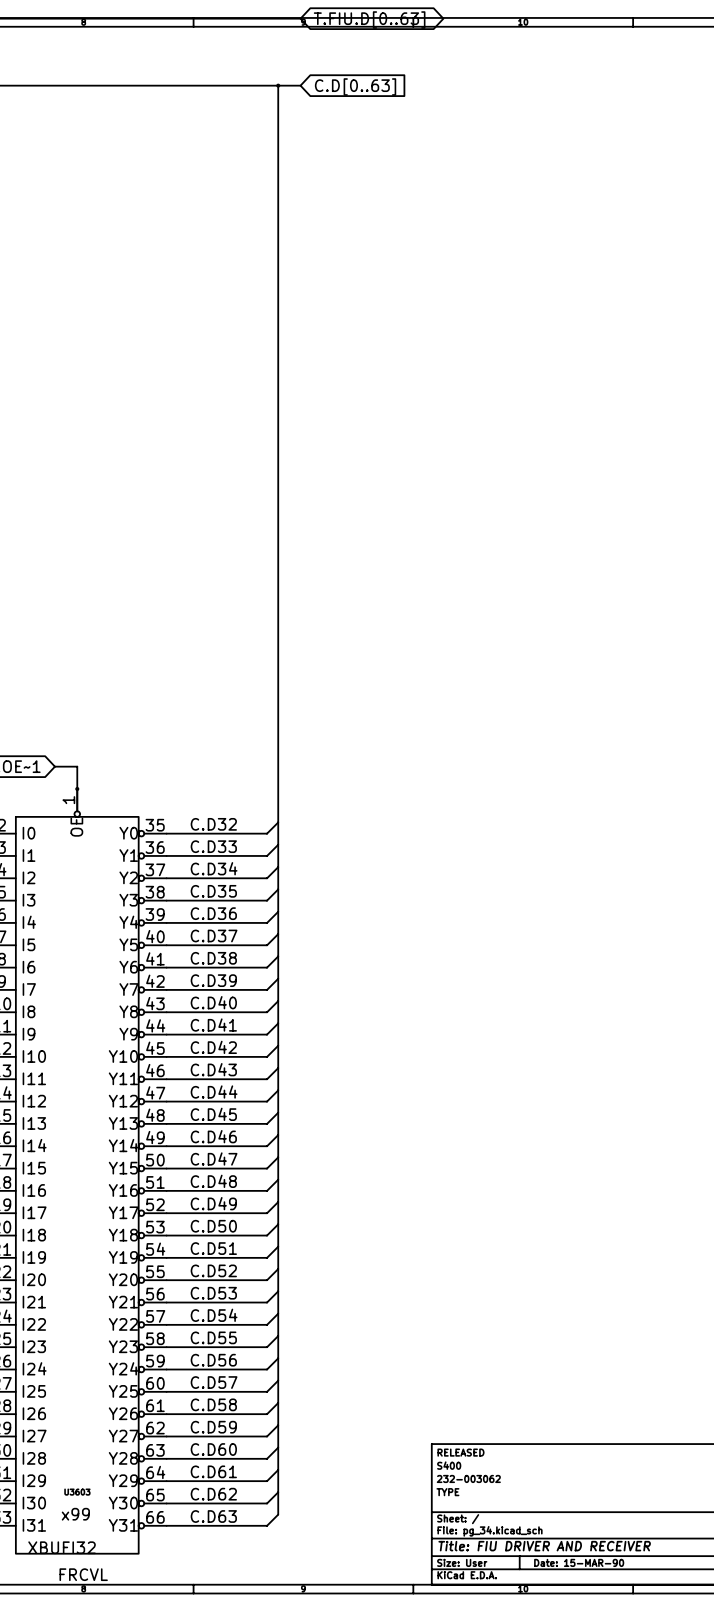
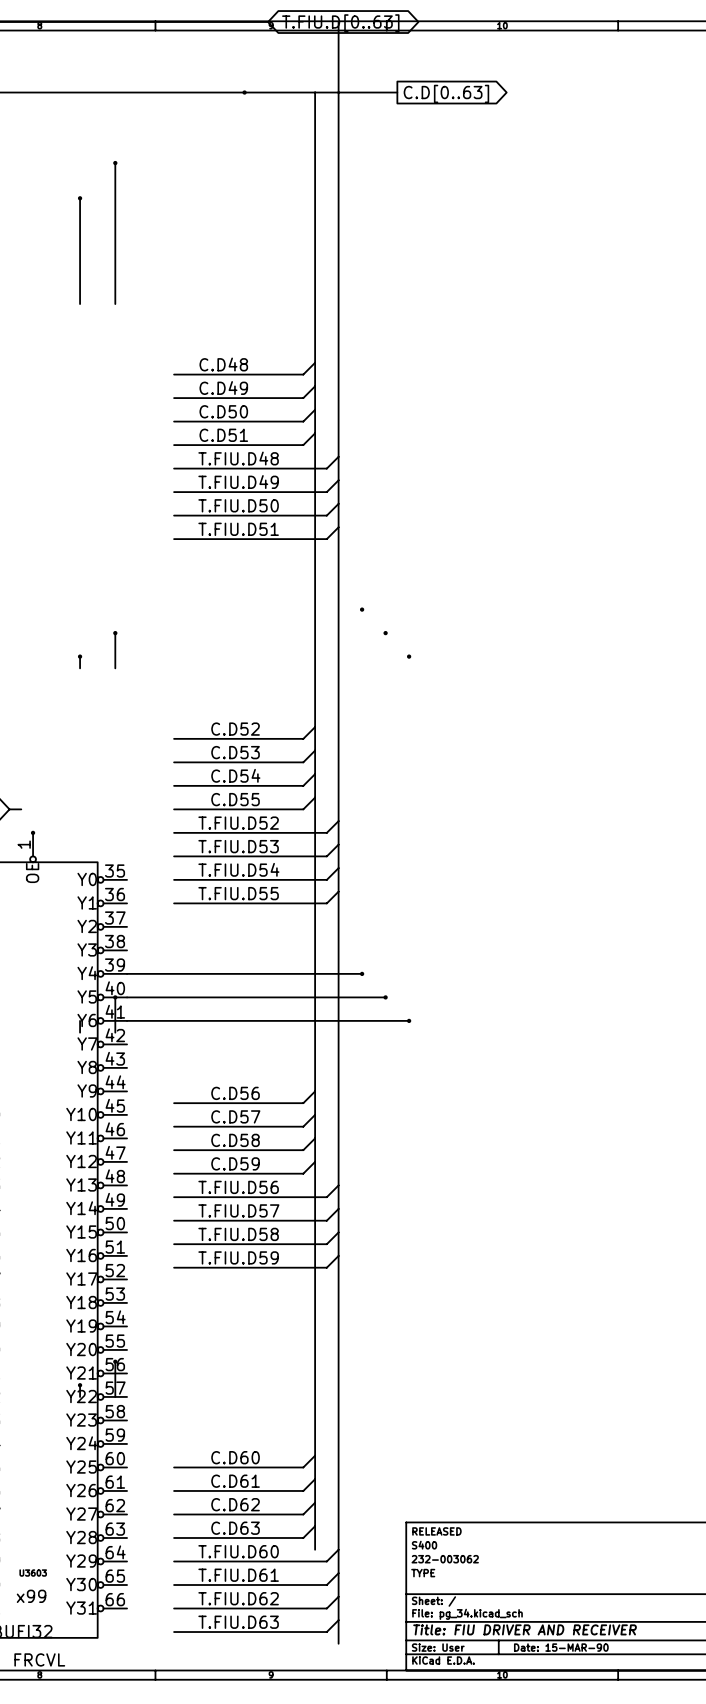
bus: none -> (338, 22) (338, 1643)
bus: (278, 85) (278, 1514) -> none
bus: none -> (268, 92) (397, 92)
bus: none -> (315, 92) (315, 1549)
global label: C.D[0..63] (355, 86) -> none
global label: none -> C.D[0..63] (446, 93)
wire: none -> (115, 163) (115, 304)
junction: none -> (115, 163)
wire: none -> (80, 198) (80, 304)
junction: none -> (80, 198)
wire: none -> (315, 362) (303, 374) (174, 374)
label: none -> C.D48 (223, 364)
wire: none -> (315, 386) (303, 398) (174, 398)
label: none -> C.D49 (223, 388)
wire: none -> (315, 409) (303, 421) (174, 421)
label: none -> C.D50 (223, 411)
wire: none -> (315, 433) (303, 445) (174, 445)
label: none -> C.D51 (223, 435)
wire: none -> (338, 456) (326, 468) (174, 468)
label: none -> T.FIU.D48 (238, 458)
wire: none -> (338, 480) (326, 492) (174, 492)
label: none -> T.FIU.D49 (238, 482)
wire: none -> (338, 503) (326, 515) (174, 515)
label: none -> T.FIU.D50 (238, 505)
wire: none -> (338, 527) (326, 539) (174, 539)
label: none -> T.FIU.D51 (238, 529)
junction: none -> (362, 609)
wire: none -> (115, 633) (115, 668)
junction: none -> (115, 633)
junction: none -> (385, 633)
wire: none -> (80, 656) (80, 668)
junction: none -> (80, 656)
junction: none -> (409, 656)
wire: none -> (315, 727) (303, 738) (174, 738)
label: none -> C.D52 (235, 729)
wire: none -> (315, 750) (303, 762) (174, 762)
label: none -> C.D53 (235, 752)
wire: none -> (315, 774) (303, 785) (174, 785)
label: none -> C.D54 (235, 775)
wire: none -> (315, 797) (303, 809) (174, 809)
label: none -> C.D55 (235, 799)
wire: (66, 766) (77, 766) (77, 811) -> none
wire: none -> (338, 821) (326, 832) (174, 832)
label: none -> T.FIU.D52 (238, 823)
wire: none -> (338, 844) (326, 856) (174, 856)
label: none -> T.FIU.D53 (238, 846)
wire: (278, 822) (267, 833) -> (338, 868) (326, 879) (232, 879)
label: C.D32 (213, 824) -> none
label: none -> T.FIU.D54 (238, 869)
wire: (166, 833) (211, 833) -> none
wire: (278, 844) (267, 855) -> (338, 891) (326, 903) (232, 903)
label: C.D33 (213, 846) -> none
label: none -> T.FIU.D55 (238, 893)
wire: (166, 855) (211, 855) -> none
wire: (278, 867) (267, 878) (166, 878) -> none
label: C.D34 (214, 868) -> none
wire: (278, 889) (267, 900) (166, 900) -> none
label: C.D35 (213, 891) -> none
wire: (278, 911) (267, 922) -> (362, 973) (232, 973)
label: C.D36 (213, 913) -> none
junction: none -> (362, 973)
wire: (278, 934) (267, 945) -> (385, 997) (232, 997)
label: C.D37 (214, 935) -> none
wire: none -> (115, 997) (115, 1032)
junction: none -> (115, 997)
junction: none -> (385, 997)
wire: (278, 956) (267, 967) -> (409, 1020) (232, 1020)
label: C.D38 (213, 958) -> none
wire: none -> (80, 1020) (80, 1032)
junction: none -> (409, 1020)
wire: (278, 978) (267, 989) (166, 989) -> none
label: C.D39 (213, 980) -> none
wire: (278, 1001) (267, 1012) (166, 1012) -> none
label: C.D40 (213, 1002) -> none
wire: (278, 1023) (267, 1034) (166, 1034) -> none
label: C.D41 (213, 1025) -> none
wire: none -> (315, 1091) (303, 1103) (174, 1103)
label: none -> C.D56 (235, 1093)
wire: (278, 1045) (267, 1056) (166, 1056) -> none
label: C.D42 (213, 1047) -> none
wire: none -> (315, 1114) (303, 1126) (174, 1126)
label: none -> C.D57 (235, 1116)
wire: (278, 1068) (267, 1079) (166, 1079) -> none
label: C.D43 (213, 1069) -> none
wire: none -> (315, 1138) (303, 1150) (174, 1150)
label: none -> C.D58 (235, 1140)
wire: (278, 1090) (267, 1101) (166, 1101) -> none
label: C.D44 (214, 1092) -> none
wire: none -> (315, 1161) (303, 1173) (174, 1173)
wire: (278, 1112) (267, 1123) (166, 1123) -> none
label: C.D45 (213, 1114) -> C.D59 (235, 1163)
wire: none -> (338, 1185) (326, 1197) (174, 1197)
label: none -> T.FIU.D56 (238, 1187)
wire: (278, 1135) (267, 1146) (166, 1146) -> none
label: C.D46 (213, 1136) -> none
wire: none -> (338, 1208) (326, 1220) (174, 1220)
label: none -> T.FIU.D57 (238, 1210)
wire: (278, 1157) (267, 1168) (166, 1168) -> none
label: C.D47 (214, 1159) -> none
wire: none -> (338, 1232) (326, 1244) (174, 1244)
label: none -> T.FIU.D58 (238, 1234)
wire: (278, 1179) (267, 1190) (166, 1190) -> none
label: C.D48 (213, 1181) -> none
wire: none -> (338, 1255) (326, 1267) (174, 1267)
label: none -> T.FIU.D59 (238, 1257)
wire: (278, 1202) (267, 1213) (166, 1213) -> none
label: C.D49 (213, 1203) -> none
wire: (278, 1224) (267, 1235) (166, 1235) -> none
label: C.D50 (213, 1226) -> none
wire: (278, 1246) (267, 1257) (166, 1257) -> none
label: C.D51 (213, 1248) -> none
wire: (278, 1269) (267, 1280) (166, 1280) -> none
label: C.D52 (213, 1270) -> none
wire: none -> (115, 1361) (115, 1396)
junction: none -> (115, 1361)
wire: (278, 1291) (267, 1302) (166, 1302) -> none
label: C.D53 (213, 1293) -> none
wire: none -> (80, 1385) (80, 1396)
junction: none -> (80, 1385)
wire: (278, 1313) (267, 1324) (166, 1324) -> none
label: C.D54 (214, 1315) -> none
wire: (278, 1336) (267, 1347) (166, 1347) -> none
label: C.D55 (213, 1337) -> none
wire: (278, 1358) (267, 1369) (166, 1369) -> none
label: C.D56 (213, 1360) -> none
wire: (278, 1380) (267, 1391) -> (315, 1455) (303, 1467) (232, 1467)
label: C.D57 (214, 1382) -> none
wire: (166, 1391) (211, 1391) -> none
wire: (278, 1403) (267, 1414) -> (315, 1479) (303, 1490) (232, 1490)
label: C.D58 (213, 1404) -> none
wire: (166, 1414) (211, 1414) -> none
wire: (278, 1425) (267, 1436) -> (315, 1502) (303, 1514) (232, 1514)
label: C.D59 (213, 1427) -> none
wire: (166, 1436) (211, 1436) -> none
wire: (278, 1447) (267, 1458) -> (315, 1526) (303, 1537) (232, 1537)
label position: C.D60 (213, 1449) -> C.D60 (235, 1457)
wire: (166, 1458) (211, 1458) -> none
wire: (278, 1469) (267, 1481) -> (338, 1549) (326, 1561) (232, 1561)
label position: C.D61 (213, 1471) -> C.D61 (235, 1481)
label: none -> T.FIU.D60 (238, 1551)
wire: (166, 1481) (211, 1481) -> none
wire: (278, 1492) (267, 1503) -> (338, 1573) (326, 1585) (232, 1585)
label position: C.D62 (213, 1494) -> C.D62 (235, 1504)
label: none -> T.FIU.D61 (238, 1575)
wire: (166, 1503) (211, 1503) -> none
wire: (278, 1514) (267, 1525) -> (338, 1596) (326, 1608) (232, 1608)
label position: C.D63 (213, 1516) -> C.D63 (235, 1528)
label: none -> T.FIU.D62 (238, 1598)
wire: (166, 1525) (211, 1525) -> none
wire: none -> (338, 1620) (326, 1632) (174, 1632)
label: none -> T.FIU.D63 (238, 1622)

